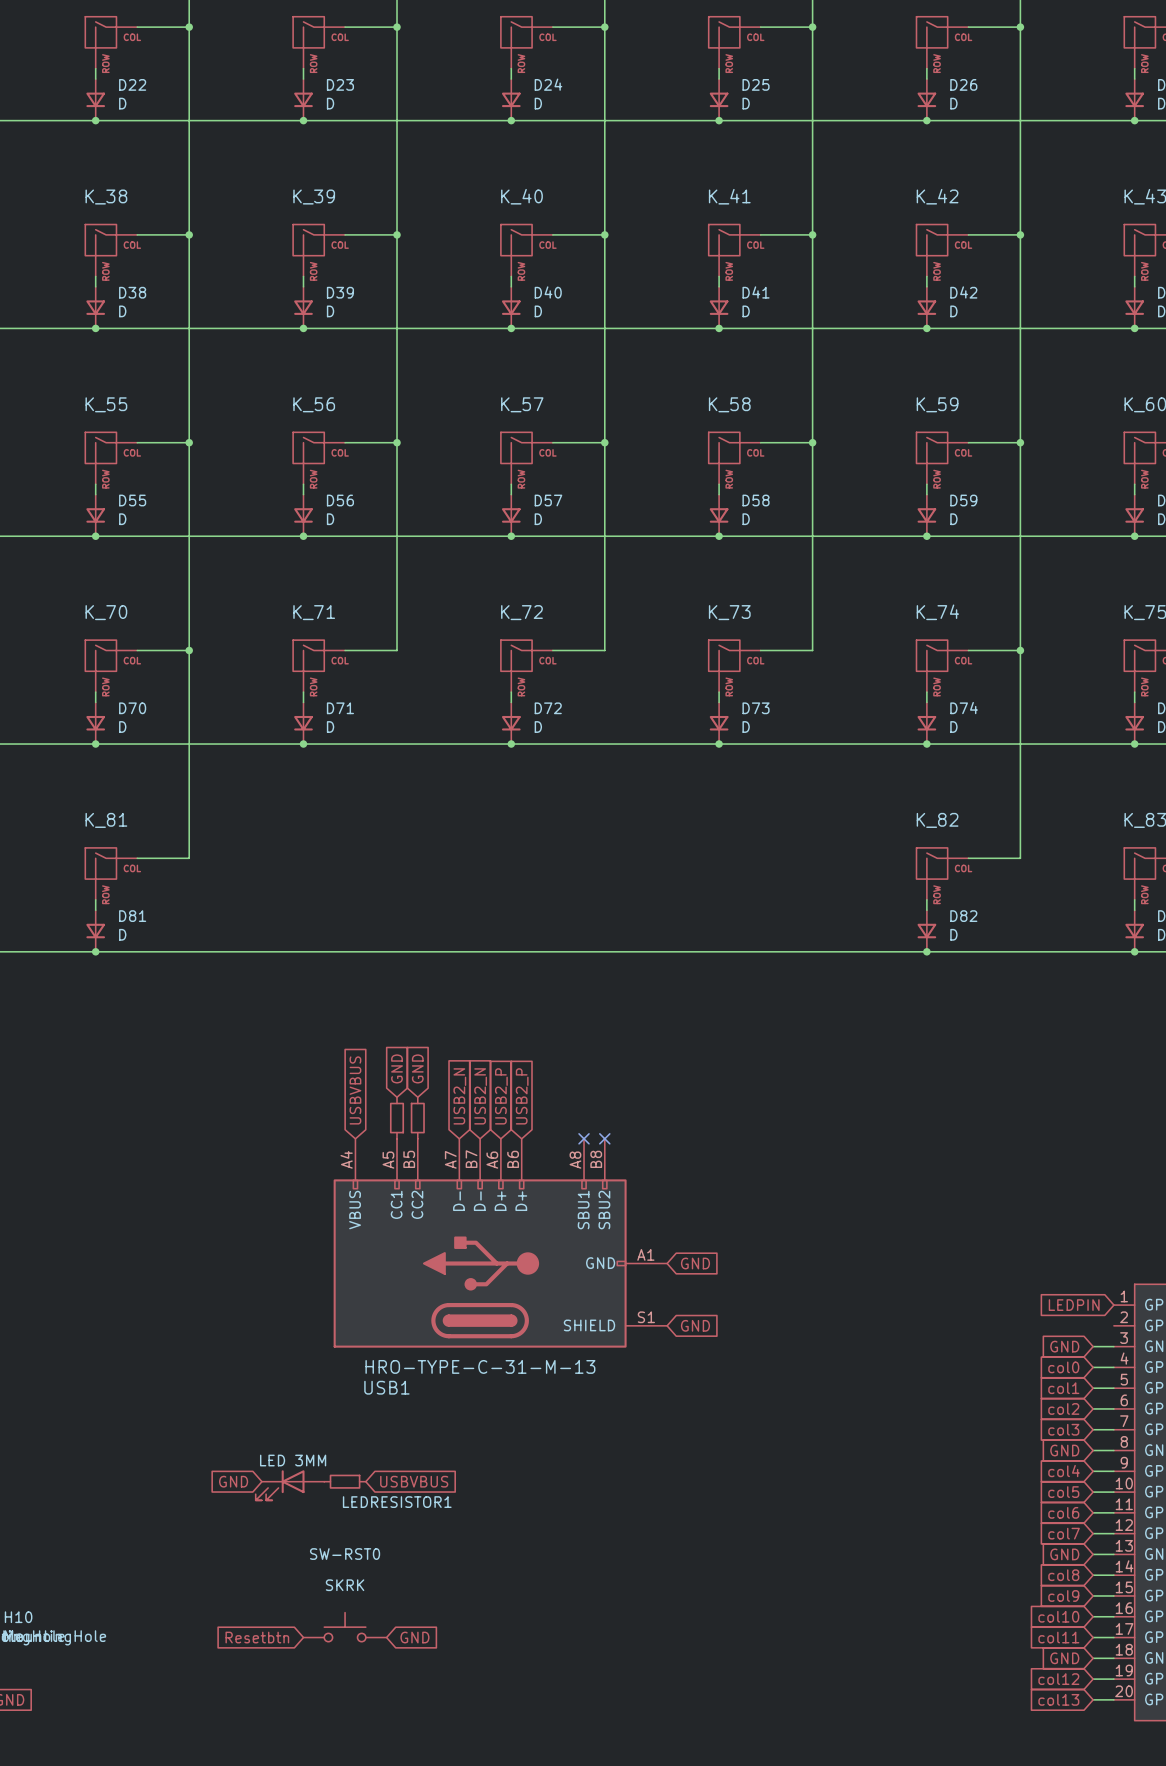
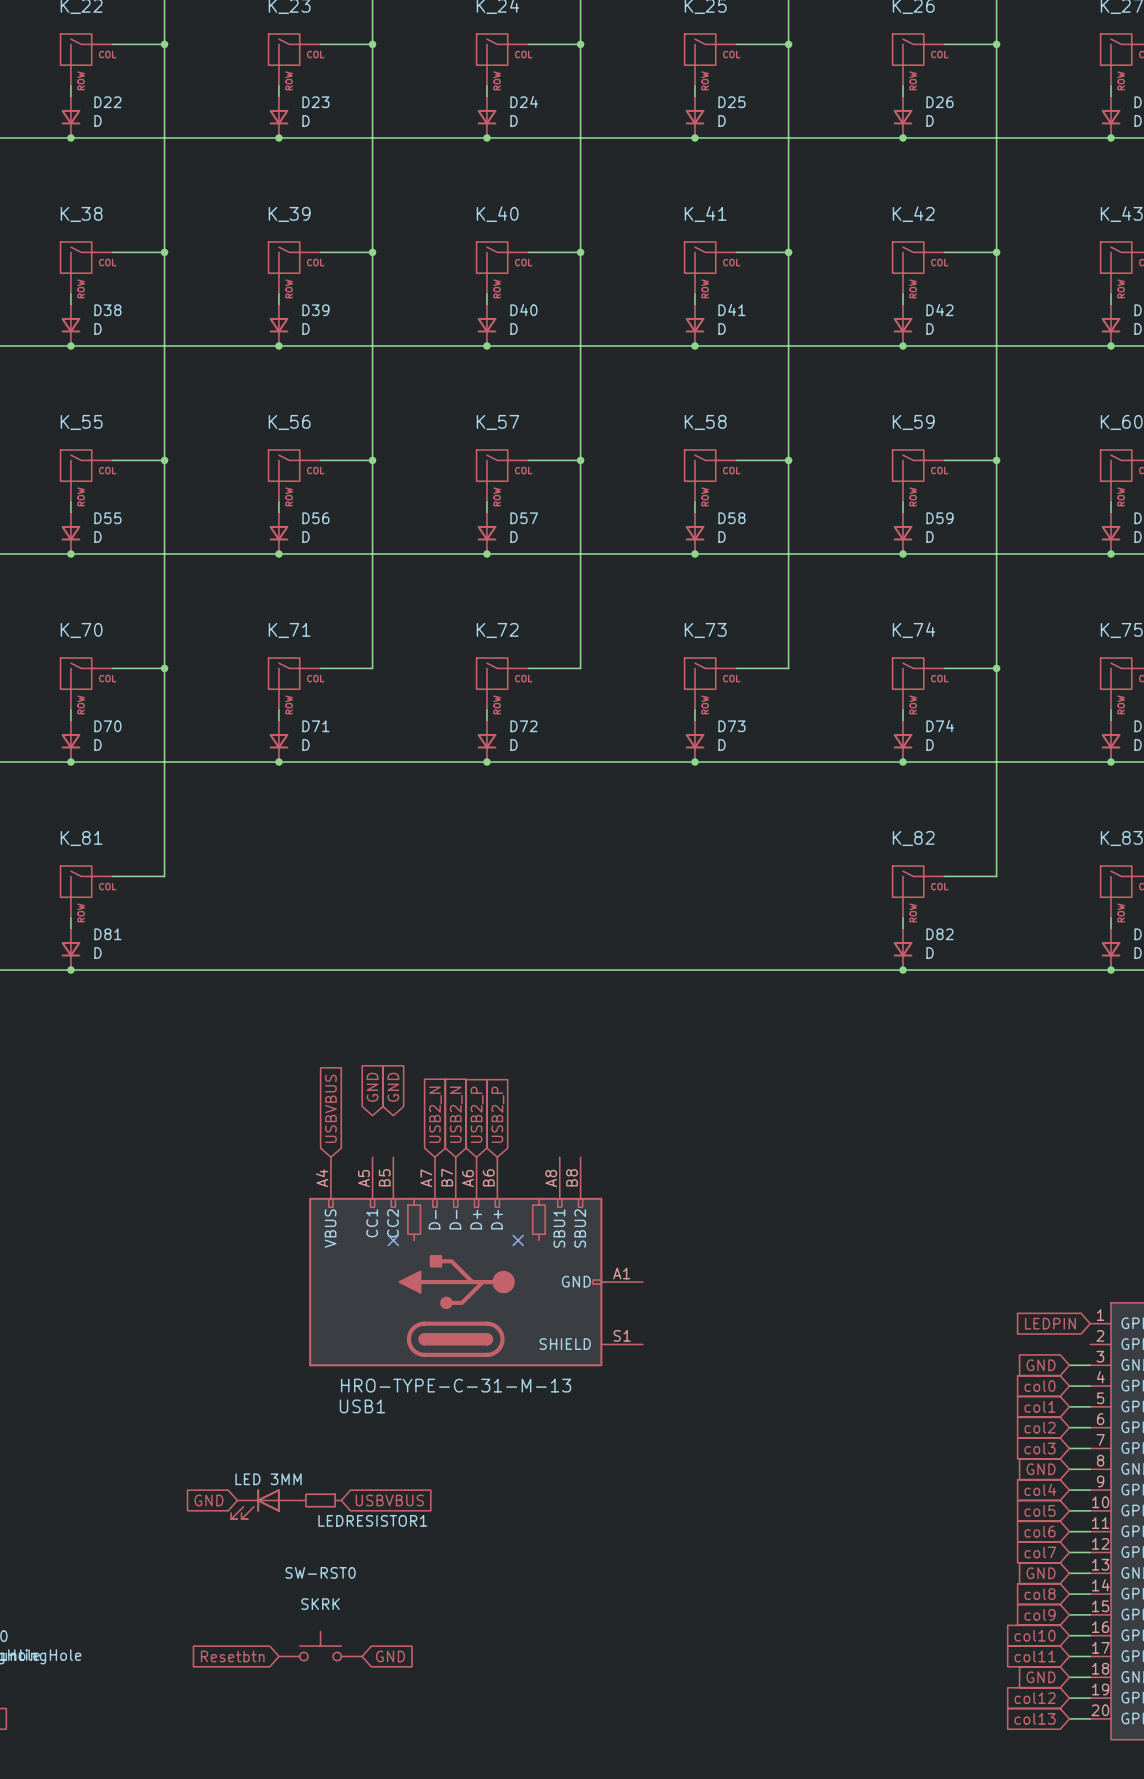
part: (397, 1118) -> none
part: (417, 1118) -> none
no-connect mark: (584, 1138) -> none
no-connect mark: (604, 1138) -> none
part: none -> (414, 1219)
part: none -> (538, 1219)
no-connect mark: none -> (393, 1240)
no-connect mark: none -> (518, 1240)
global label: GND (695, 1263) -> none
global label: GND (695, 1325) -> none

